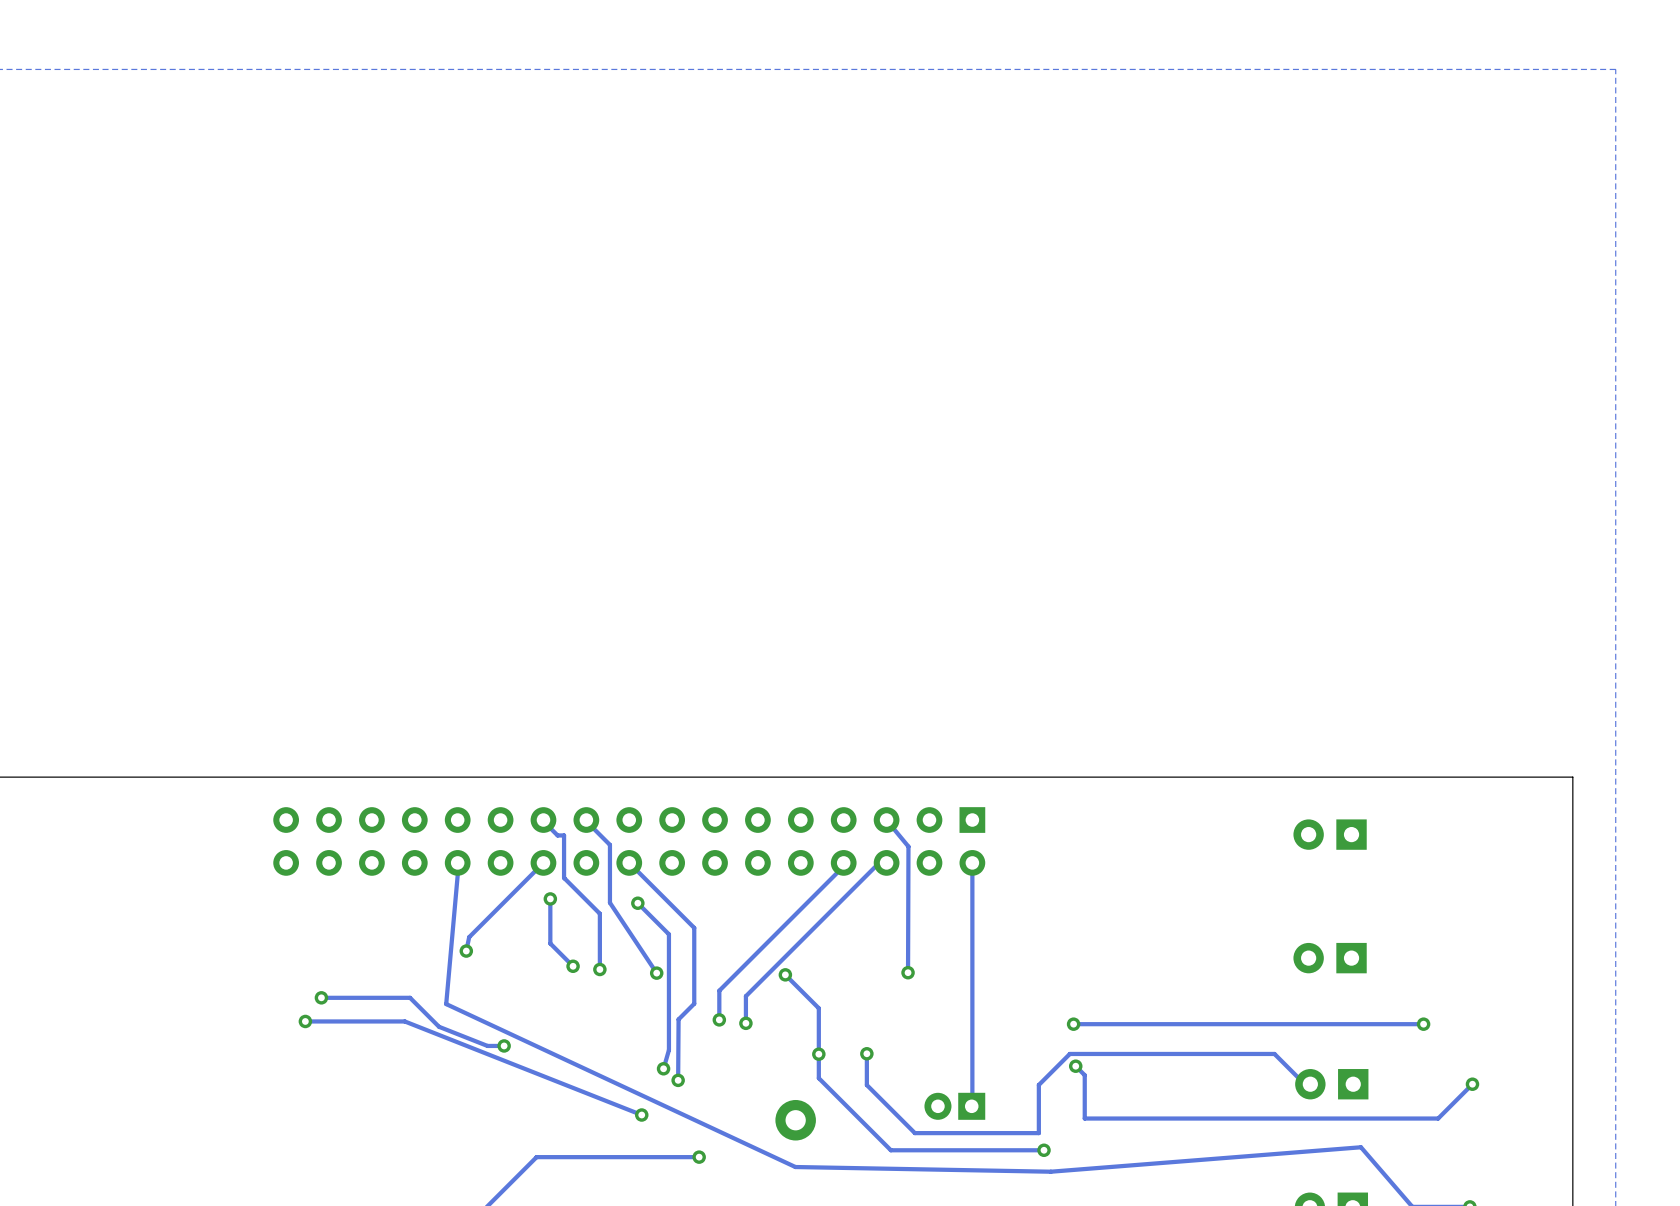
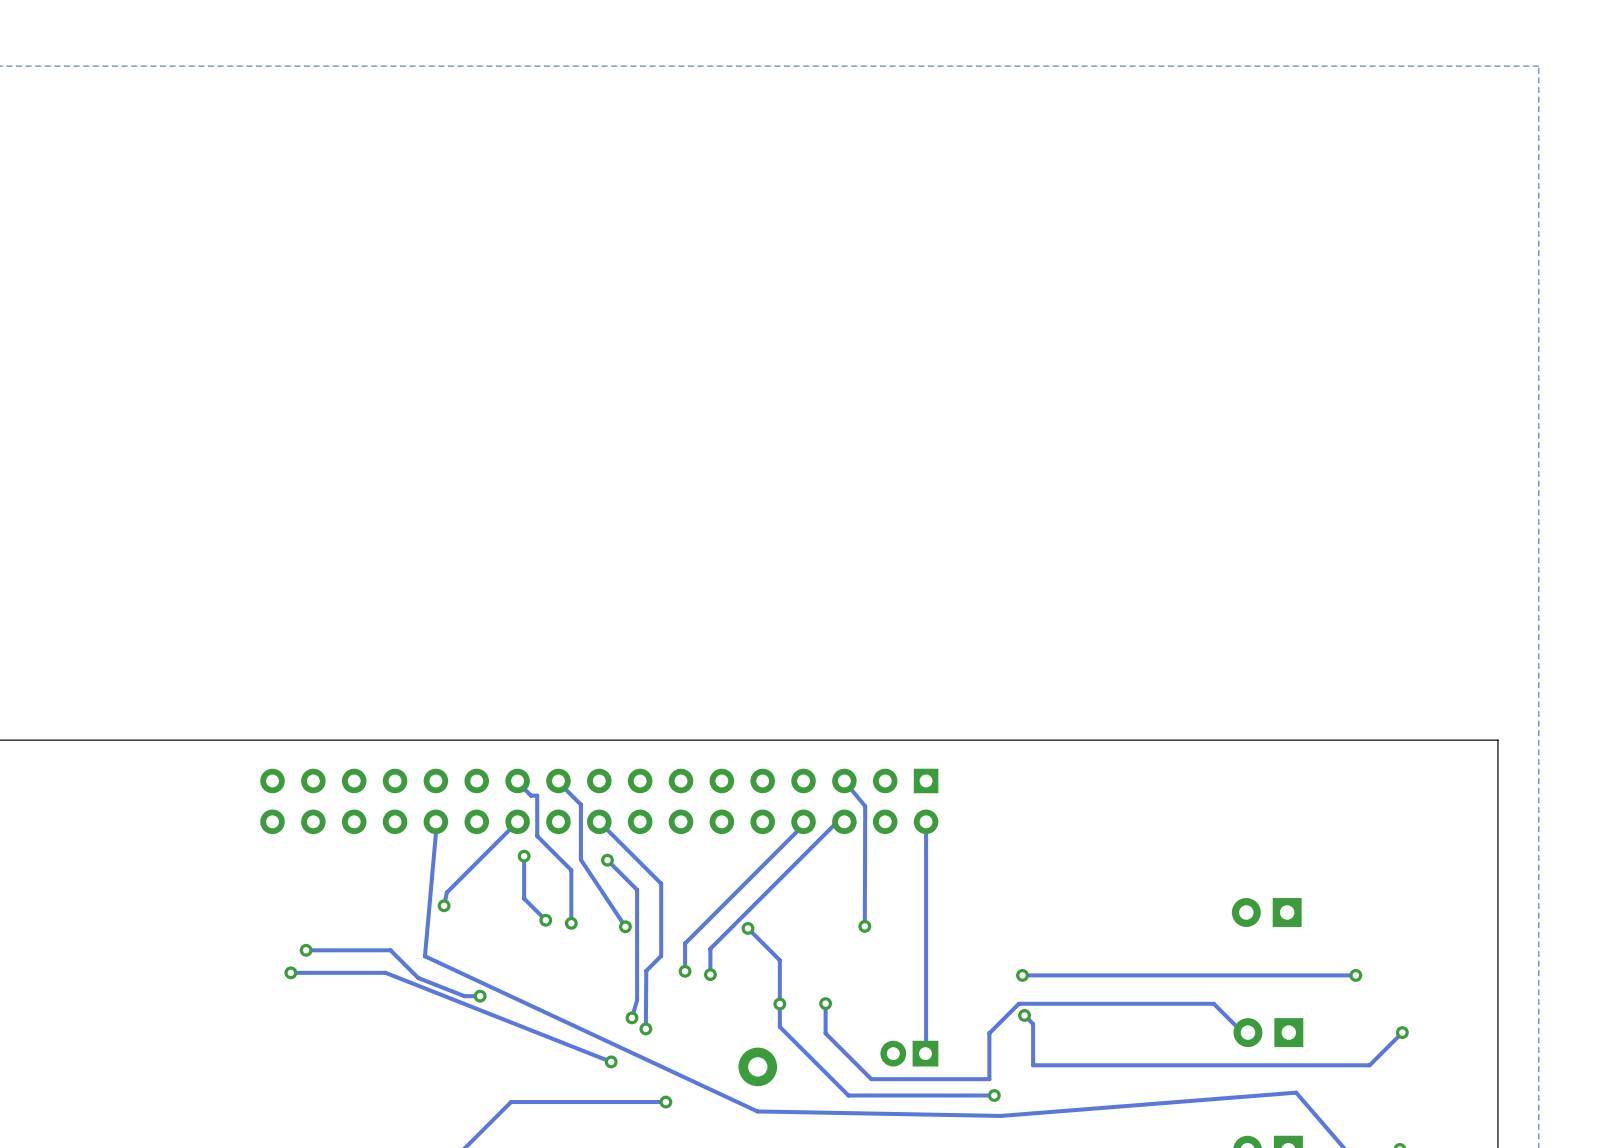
part: (1330, 834) -> none

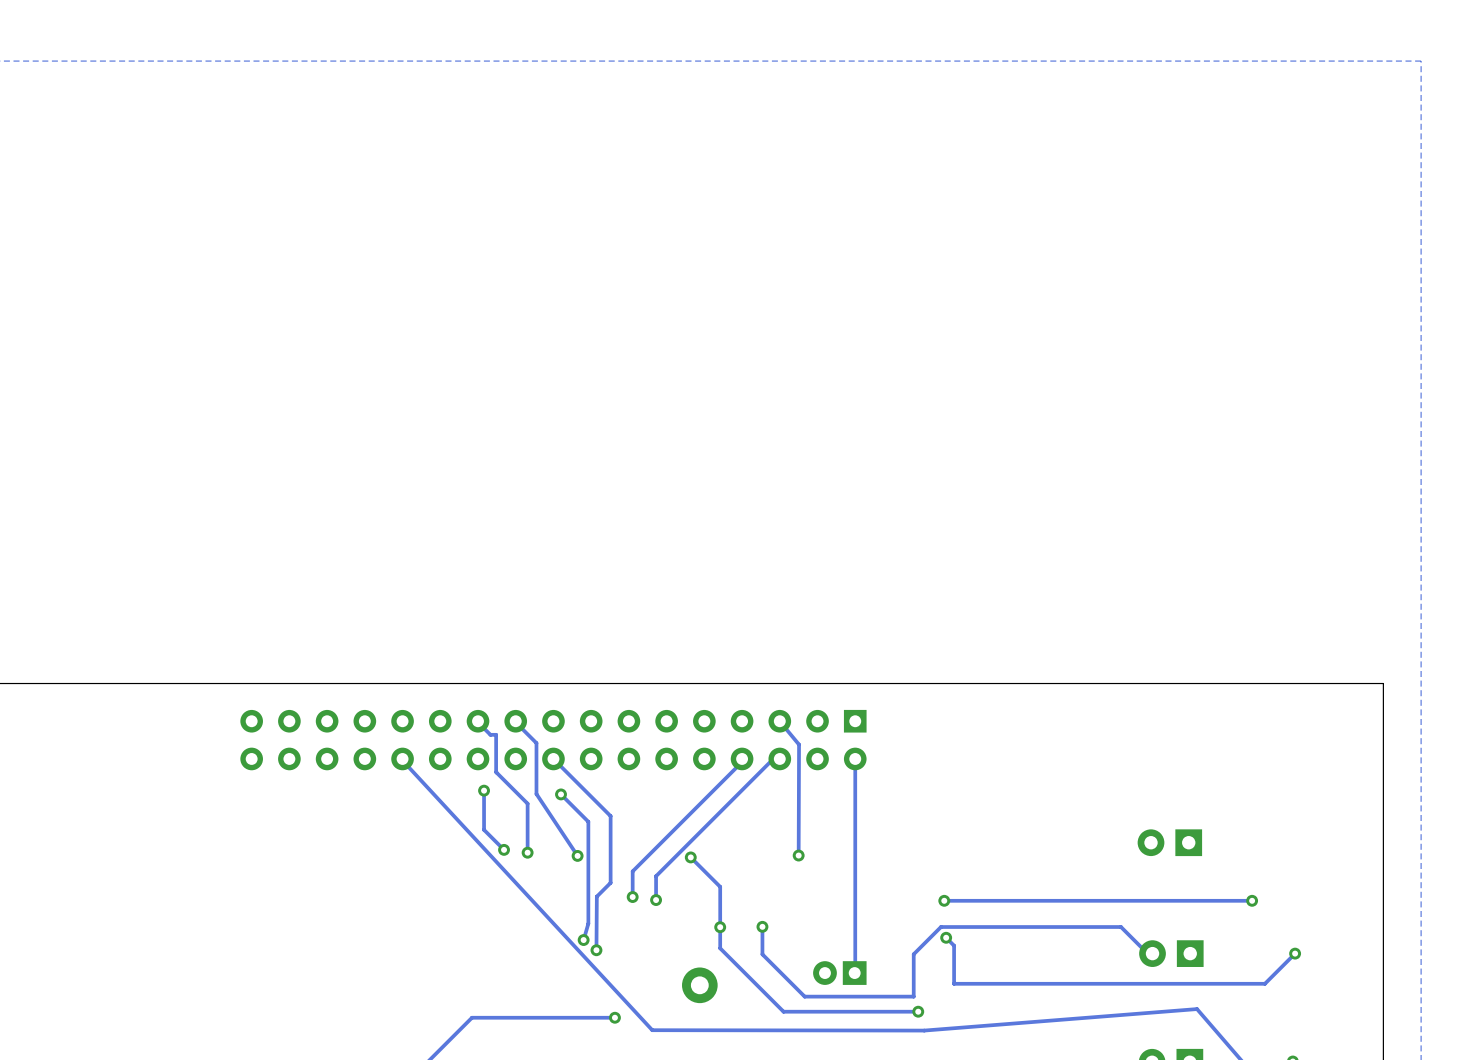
track: (435, 821) (424, 956) (757, 1111) (1000, 1115) -> (401, 759) (652, 1030) (924, 1030)
track: (517, 821) (446, 892) (444, 905) -> none
via: (444, 905) -> none
track: (306, 950) (390, 950) (418, 977) (464, 996) (480, 996) -> none
via: (306, 950) -> none
track: (290, 972) (385, 972) (611, 1061) -> none
via: (290, 972) -> none
via: (480, 996) -> none
via: (611, 1061) -> none

